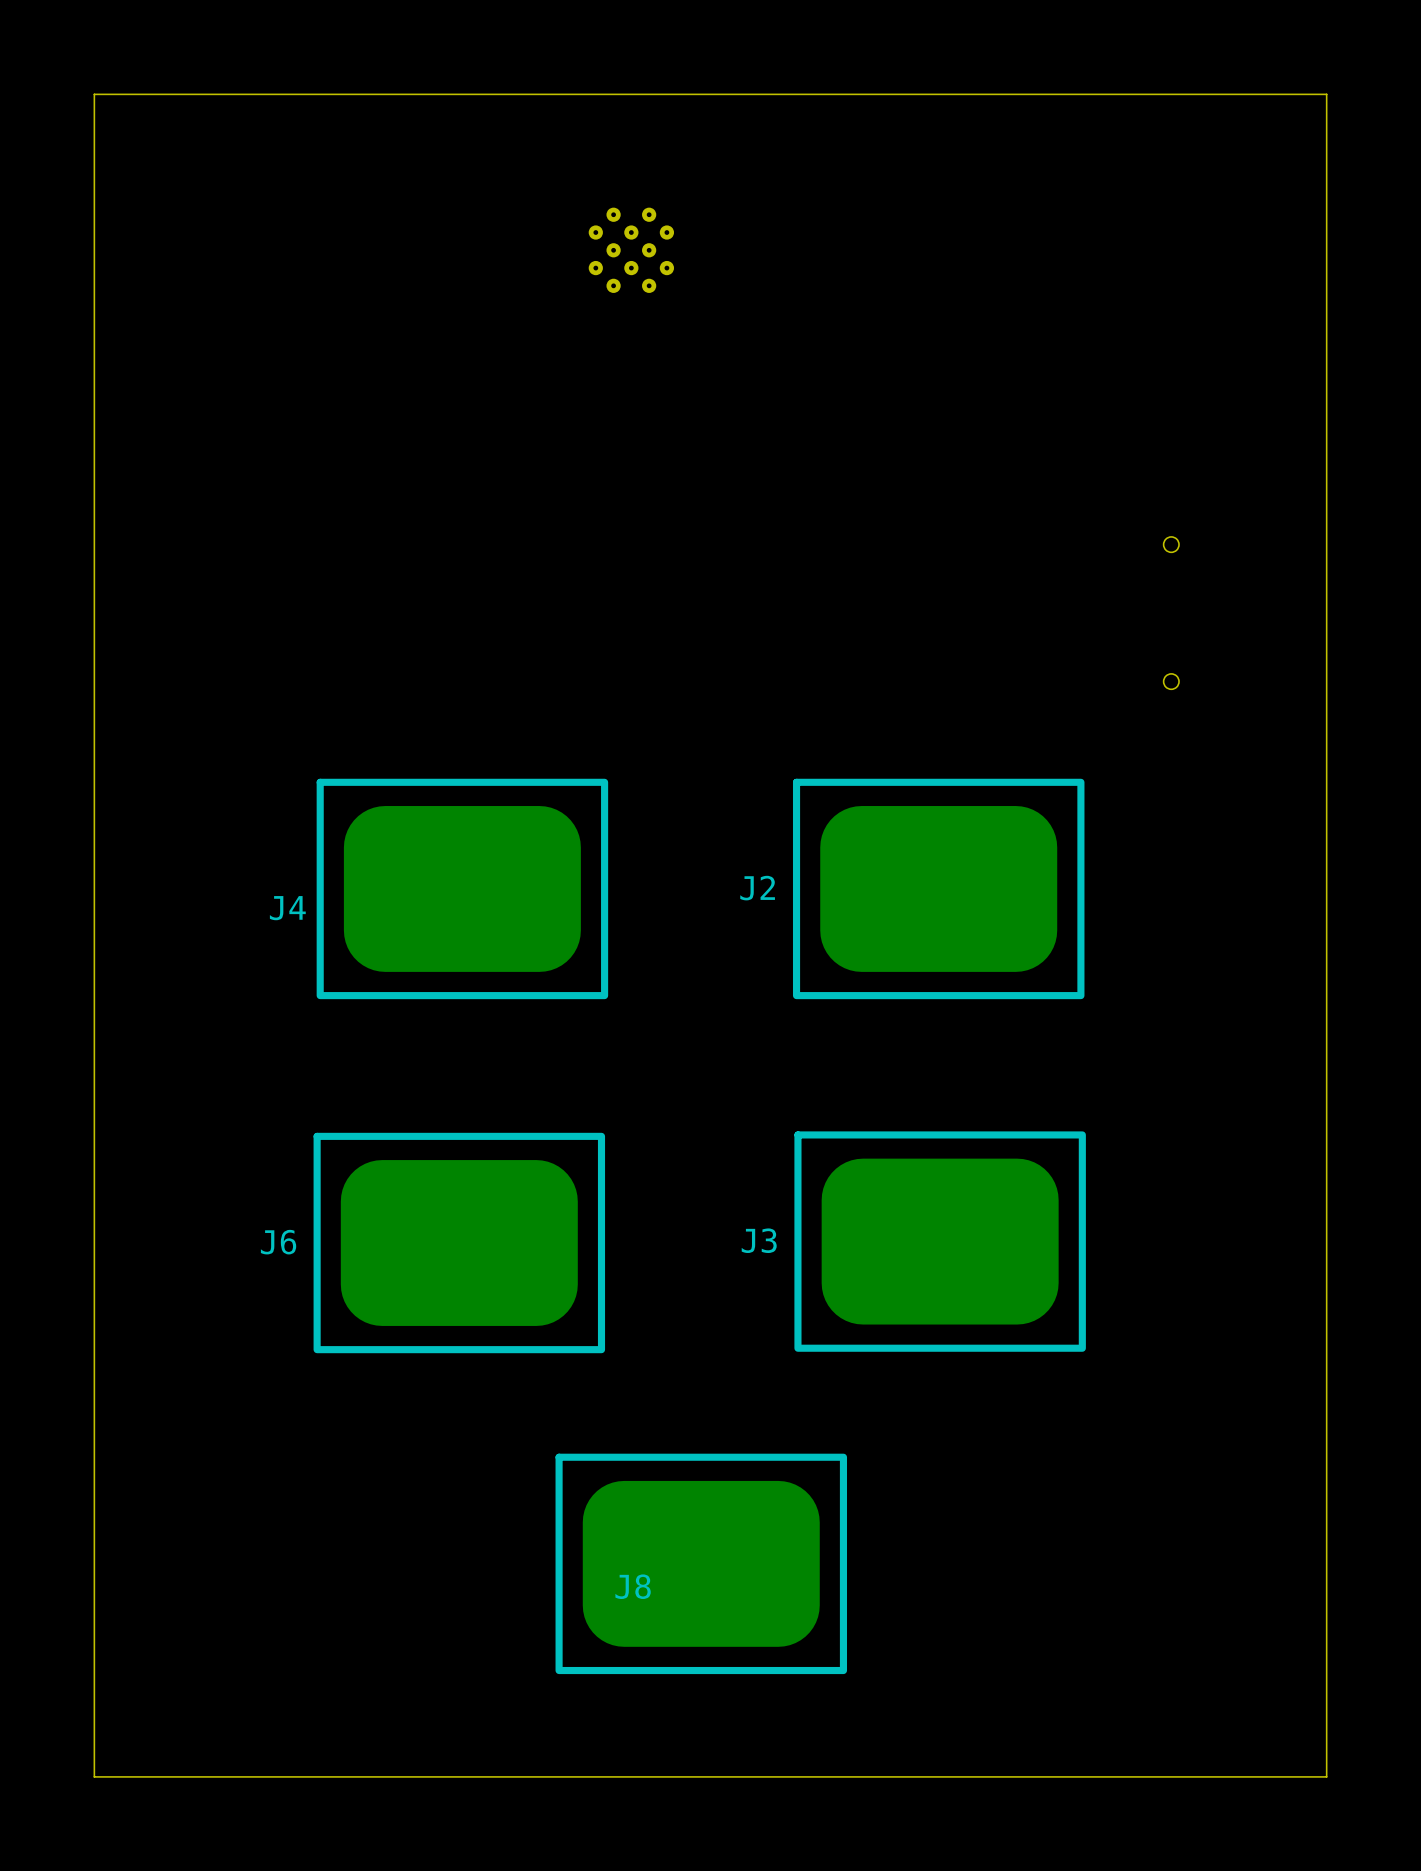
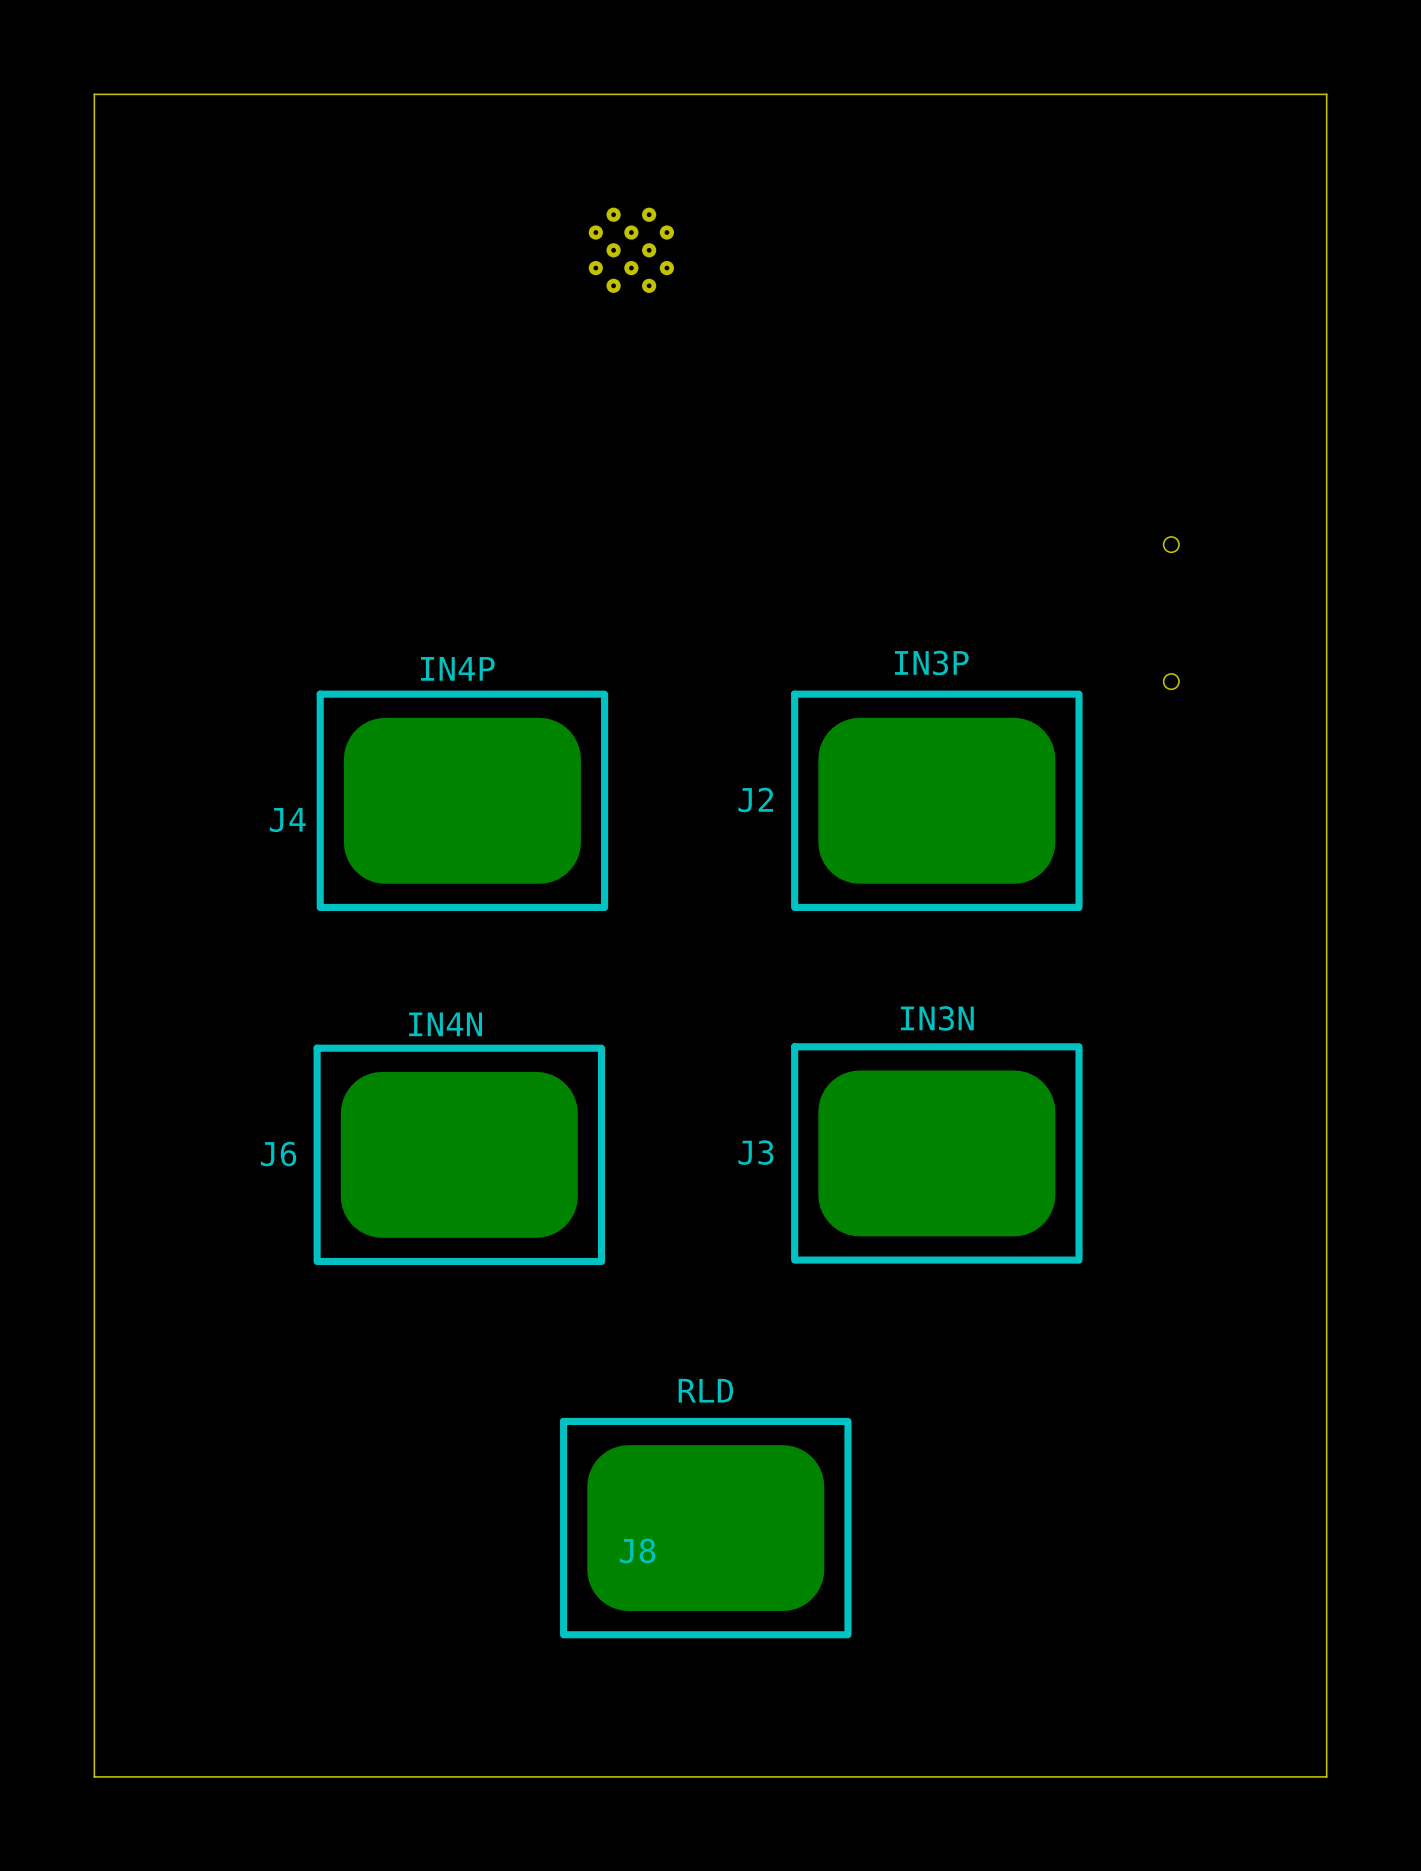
J2 value: none -> IN3P (931, 662)
J4 value: none -> IN4P (457, 668)
J4 position: (462, 888) -> (462, 800)
J2 position: (938, 888) -> (936, 800)
J3 value: none -> IN3N (937, 1018)
J6 value: none -> IN4N (445, 1024)
J3 position: (940, 1241) -> (936, 1153)
J6 position: (459, 1243) -> (459, 1154)
J8 value: none -> RLD (705, 1390)
J8 position: (701, 1563) -> (705, 1528)

